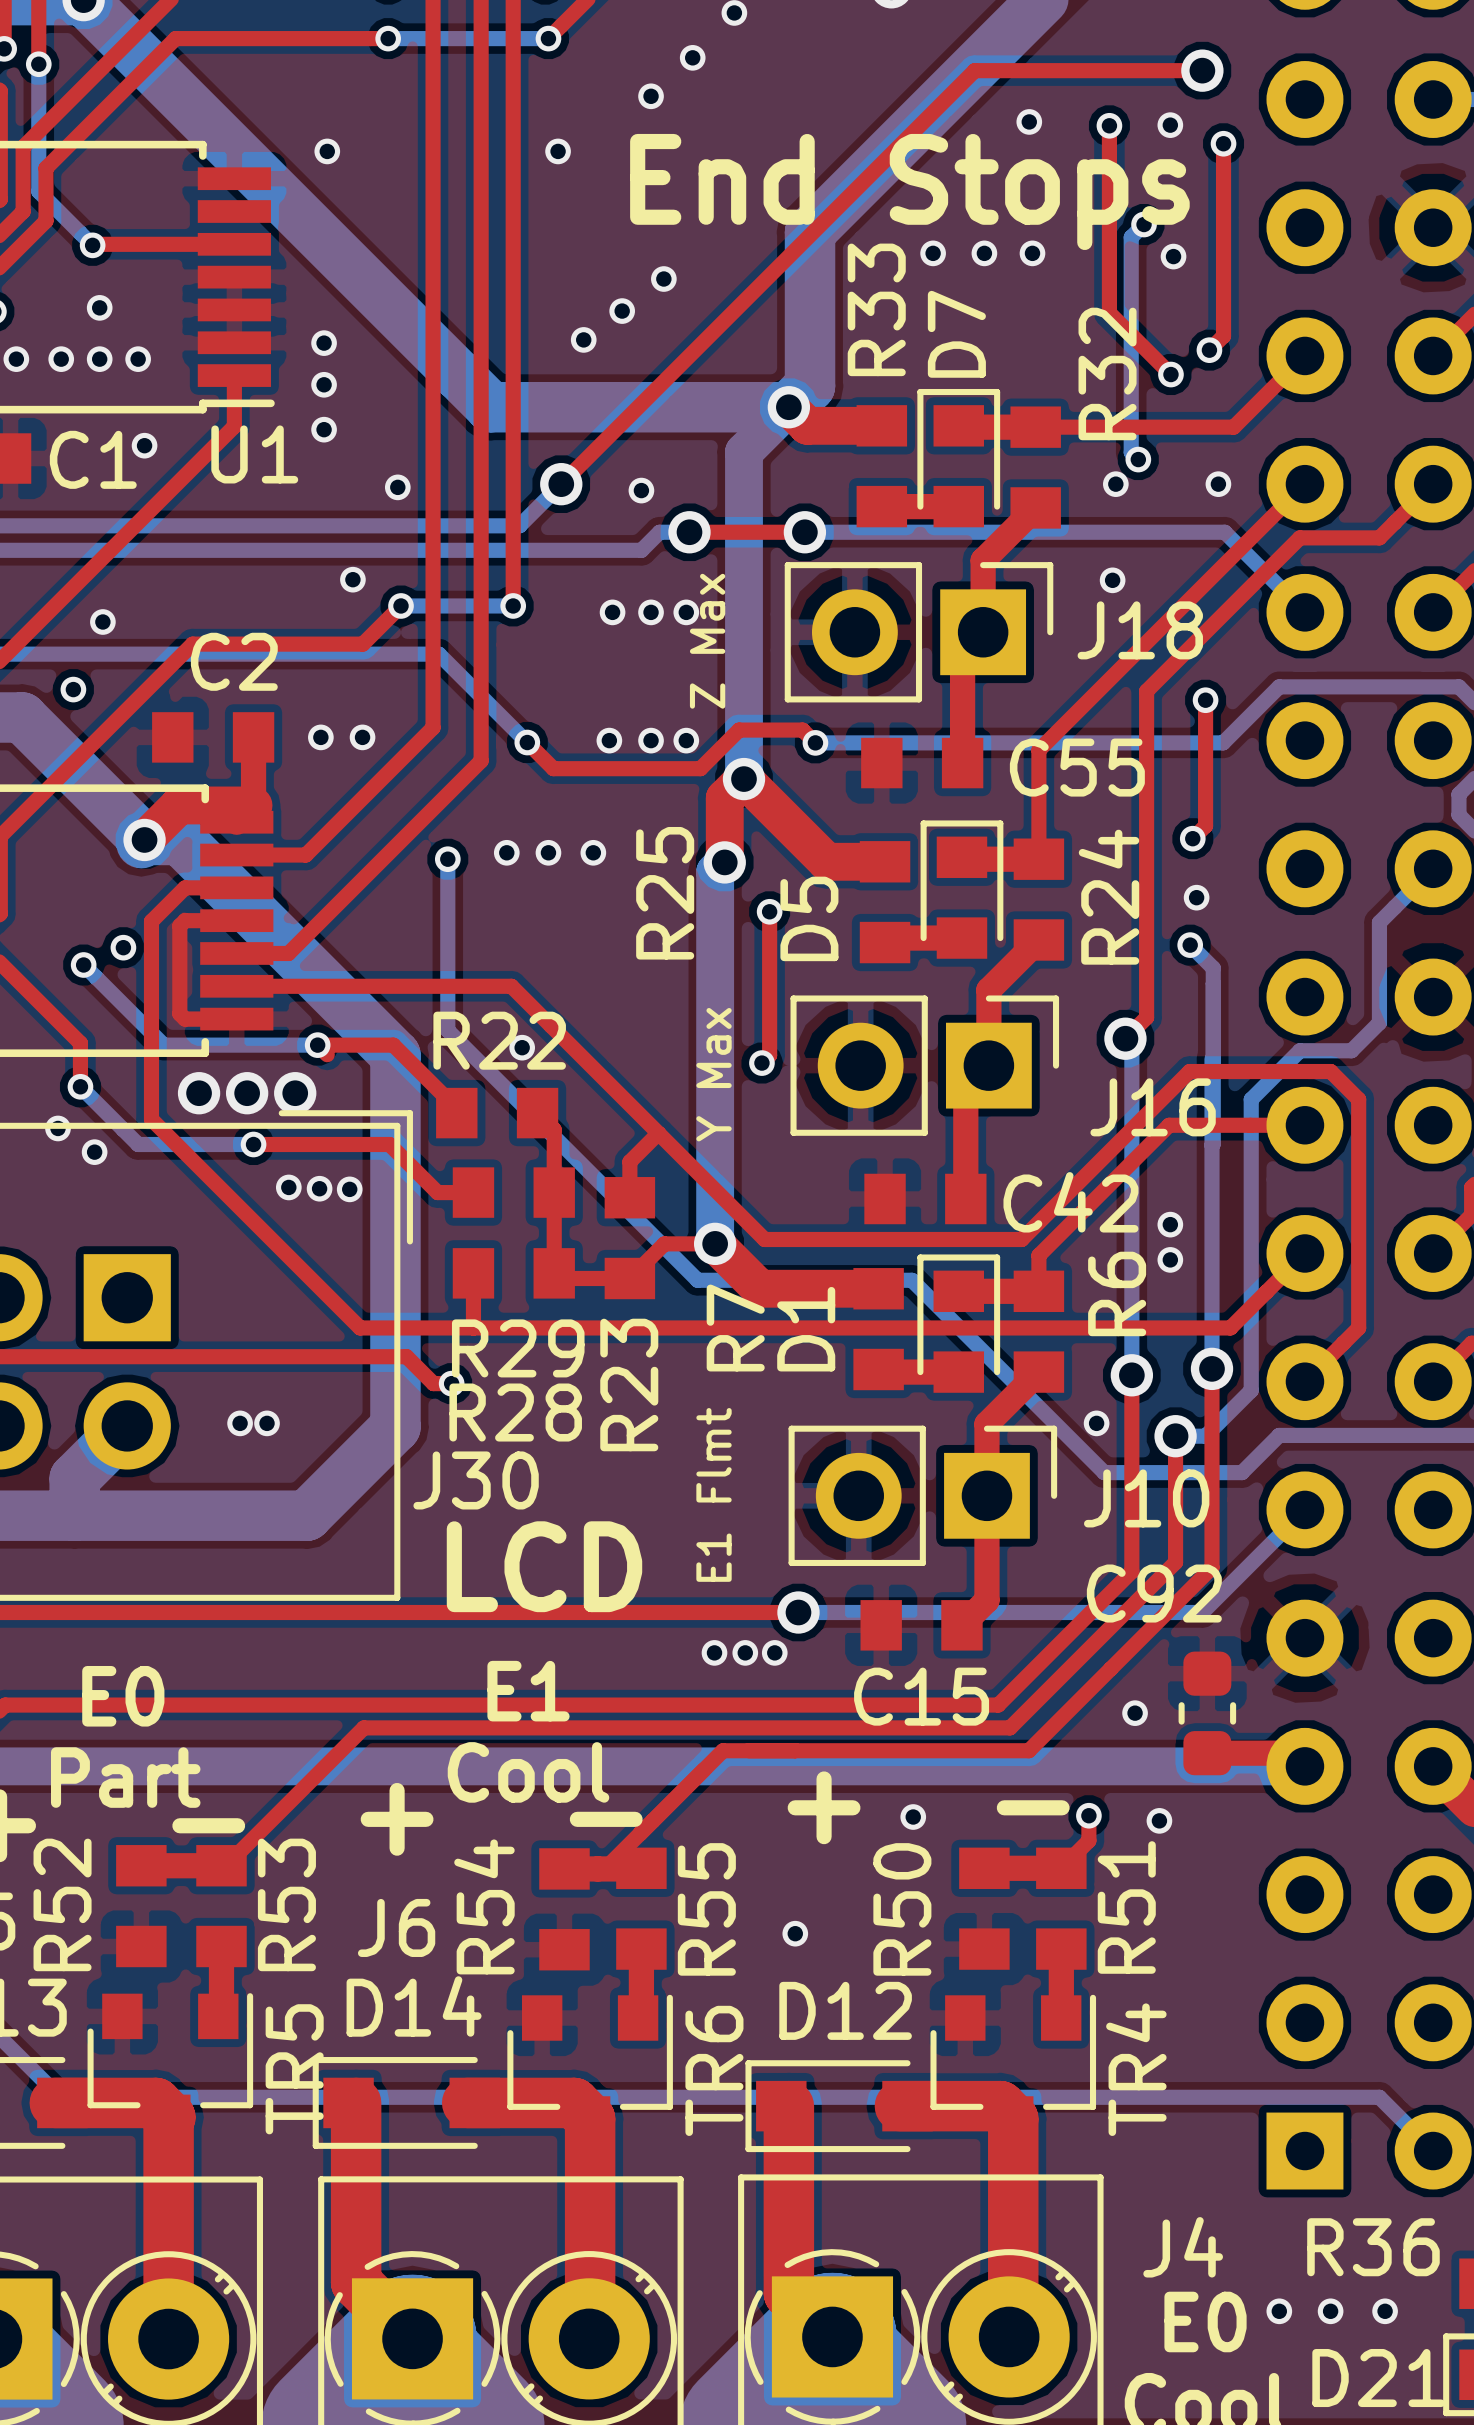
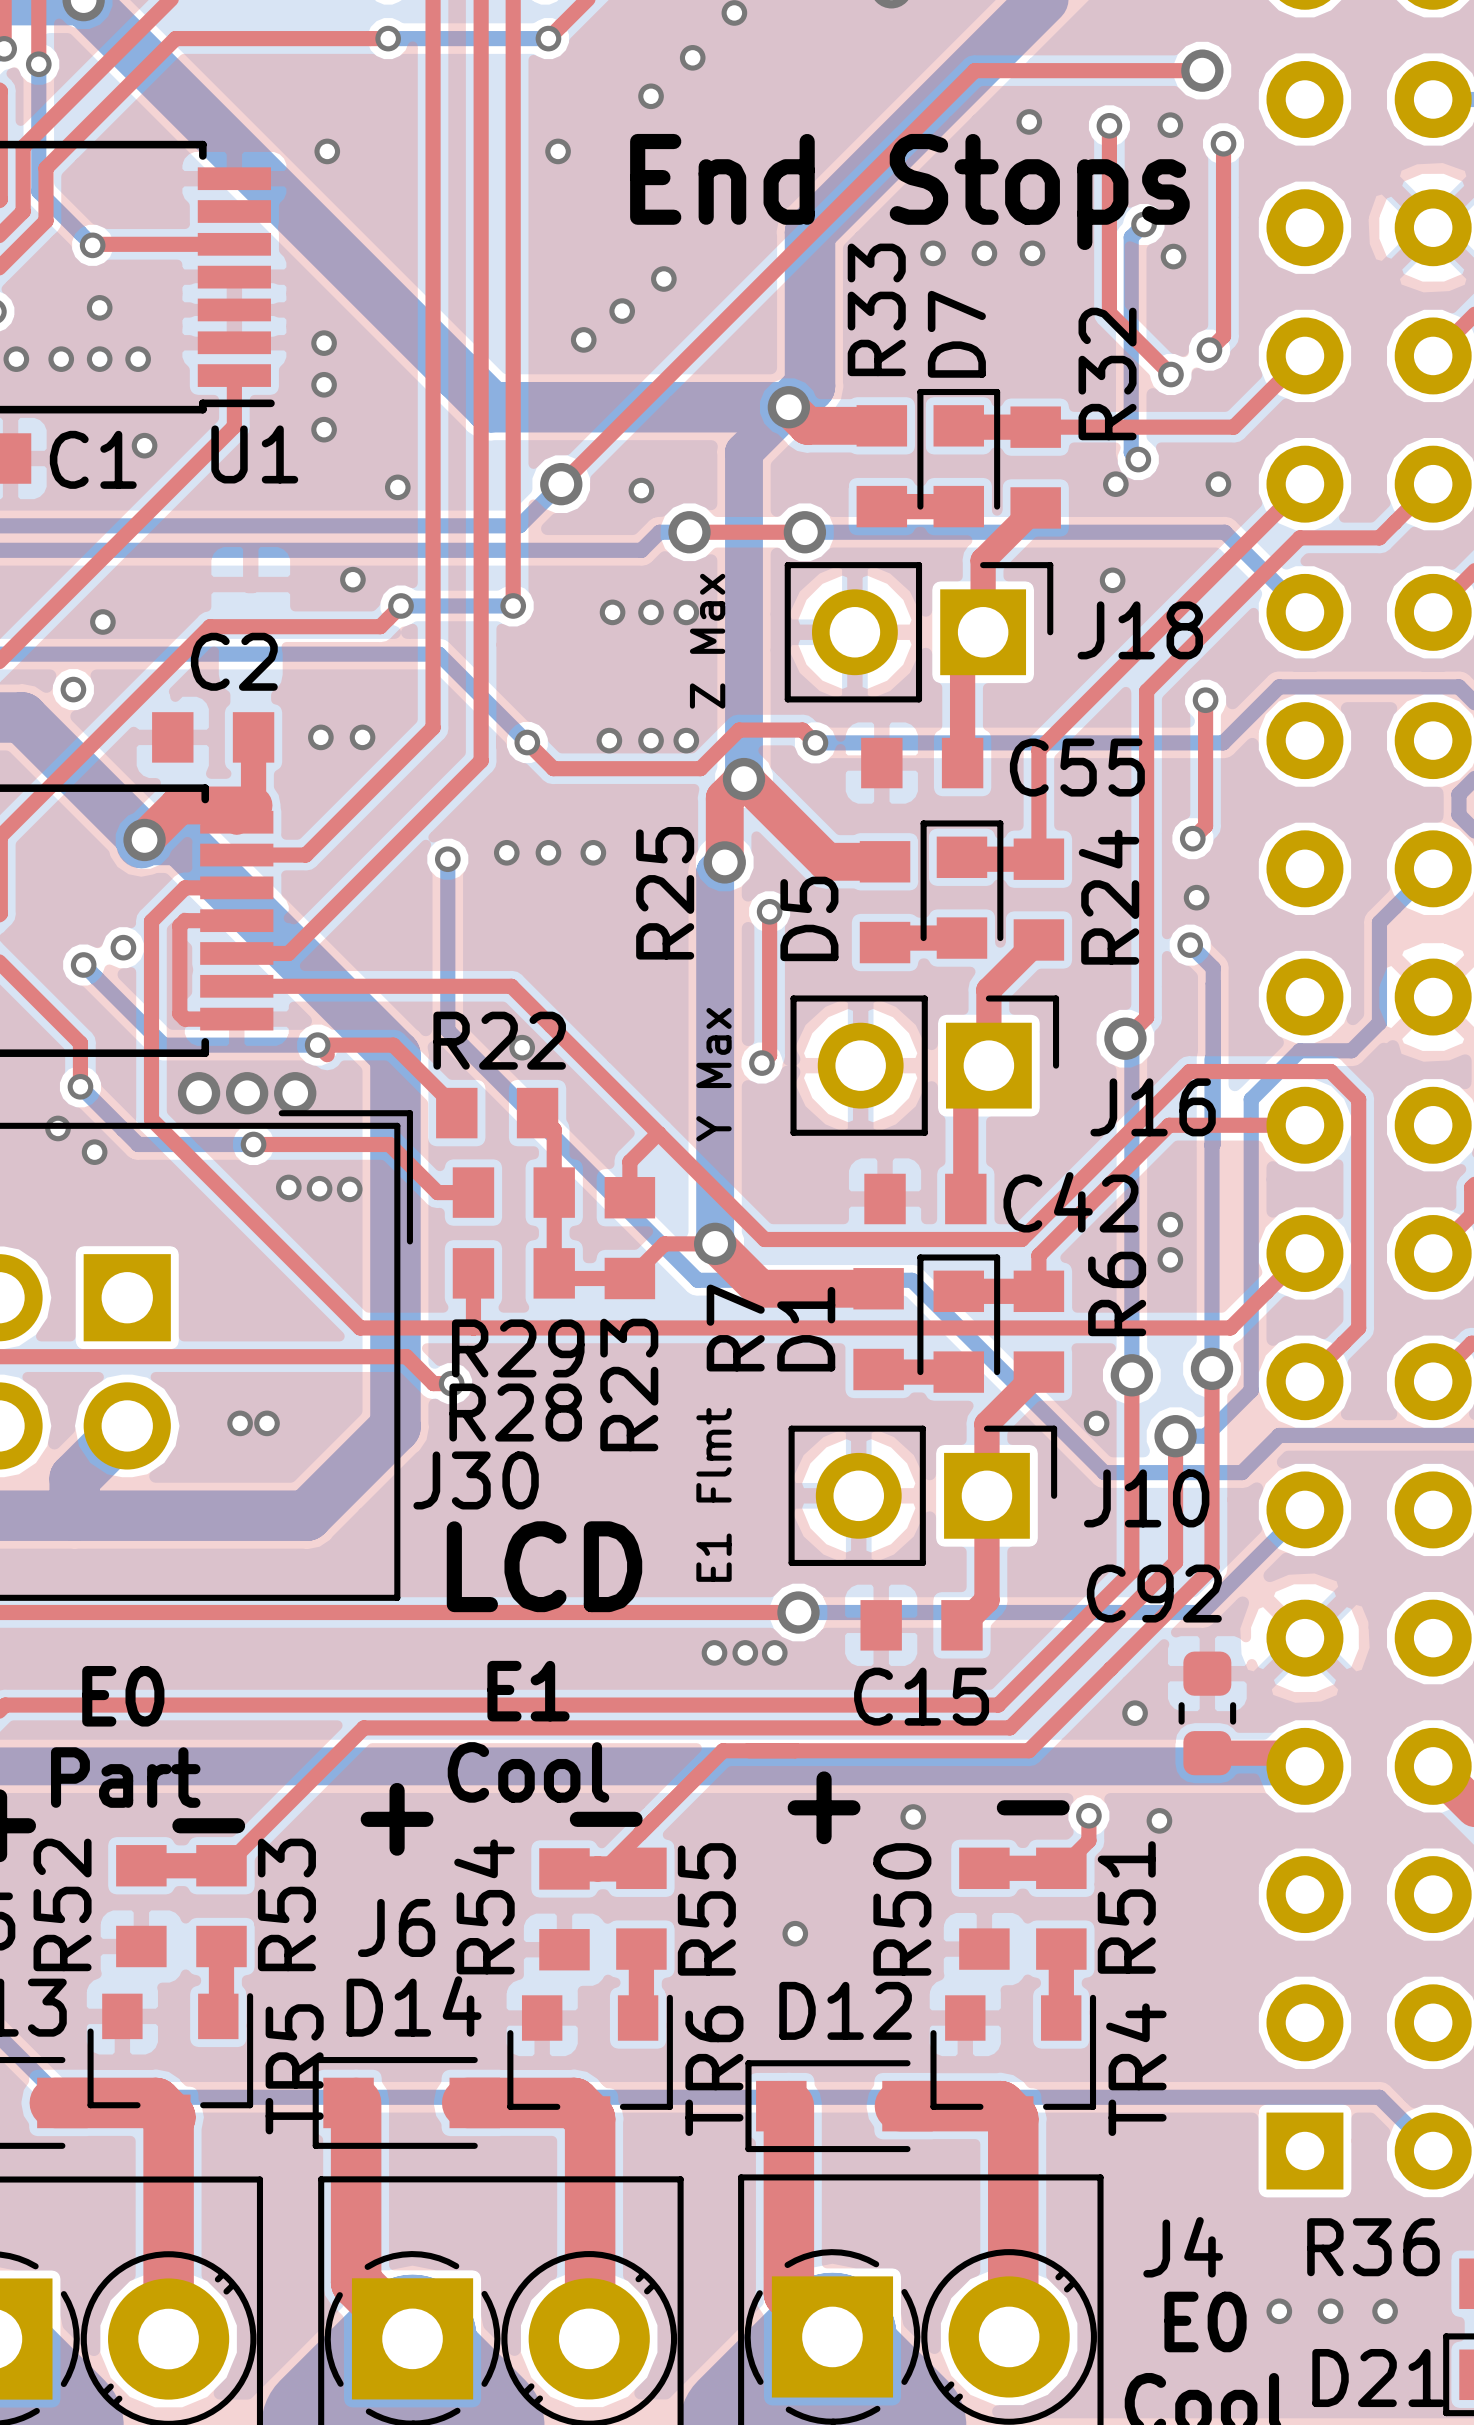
top track: (380, 626) (362, 644) (192, 644) -> (380, 626) (210, 626) (192, 644)

